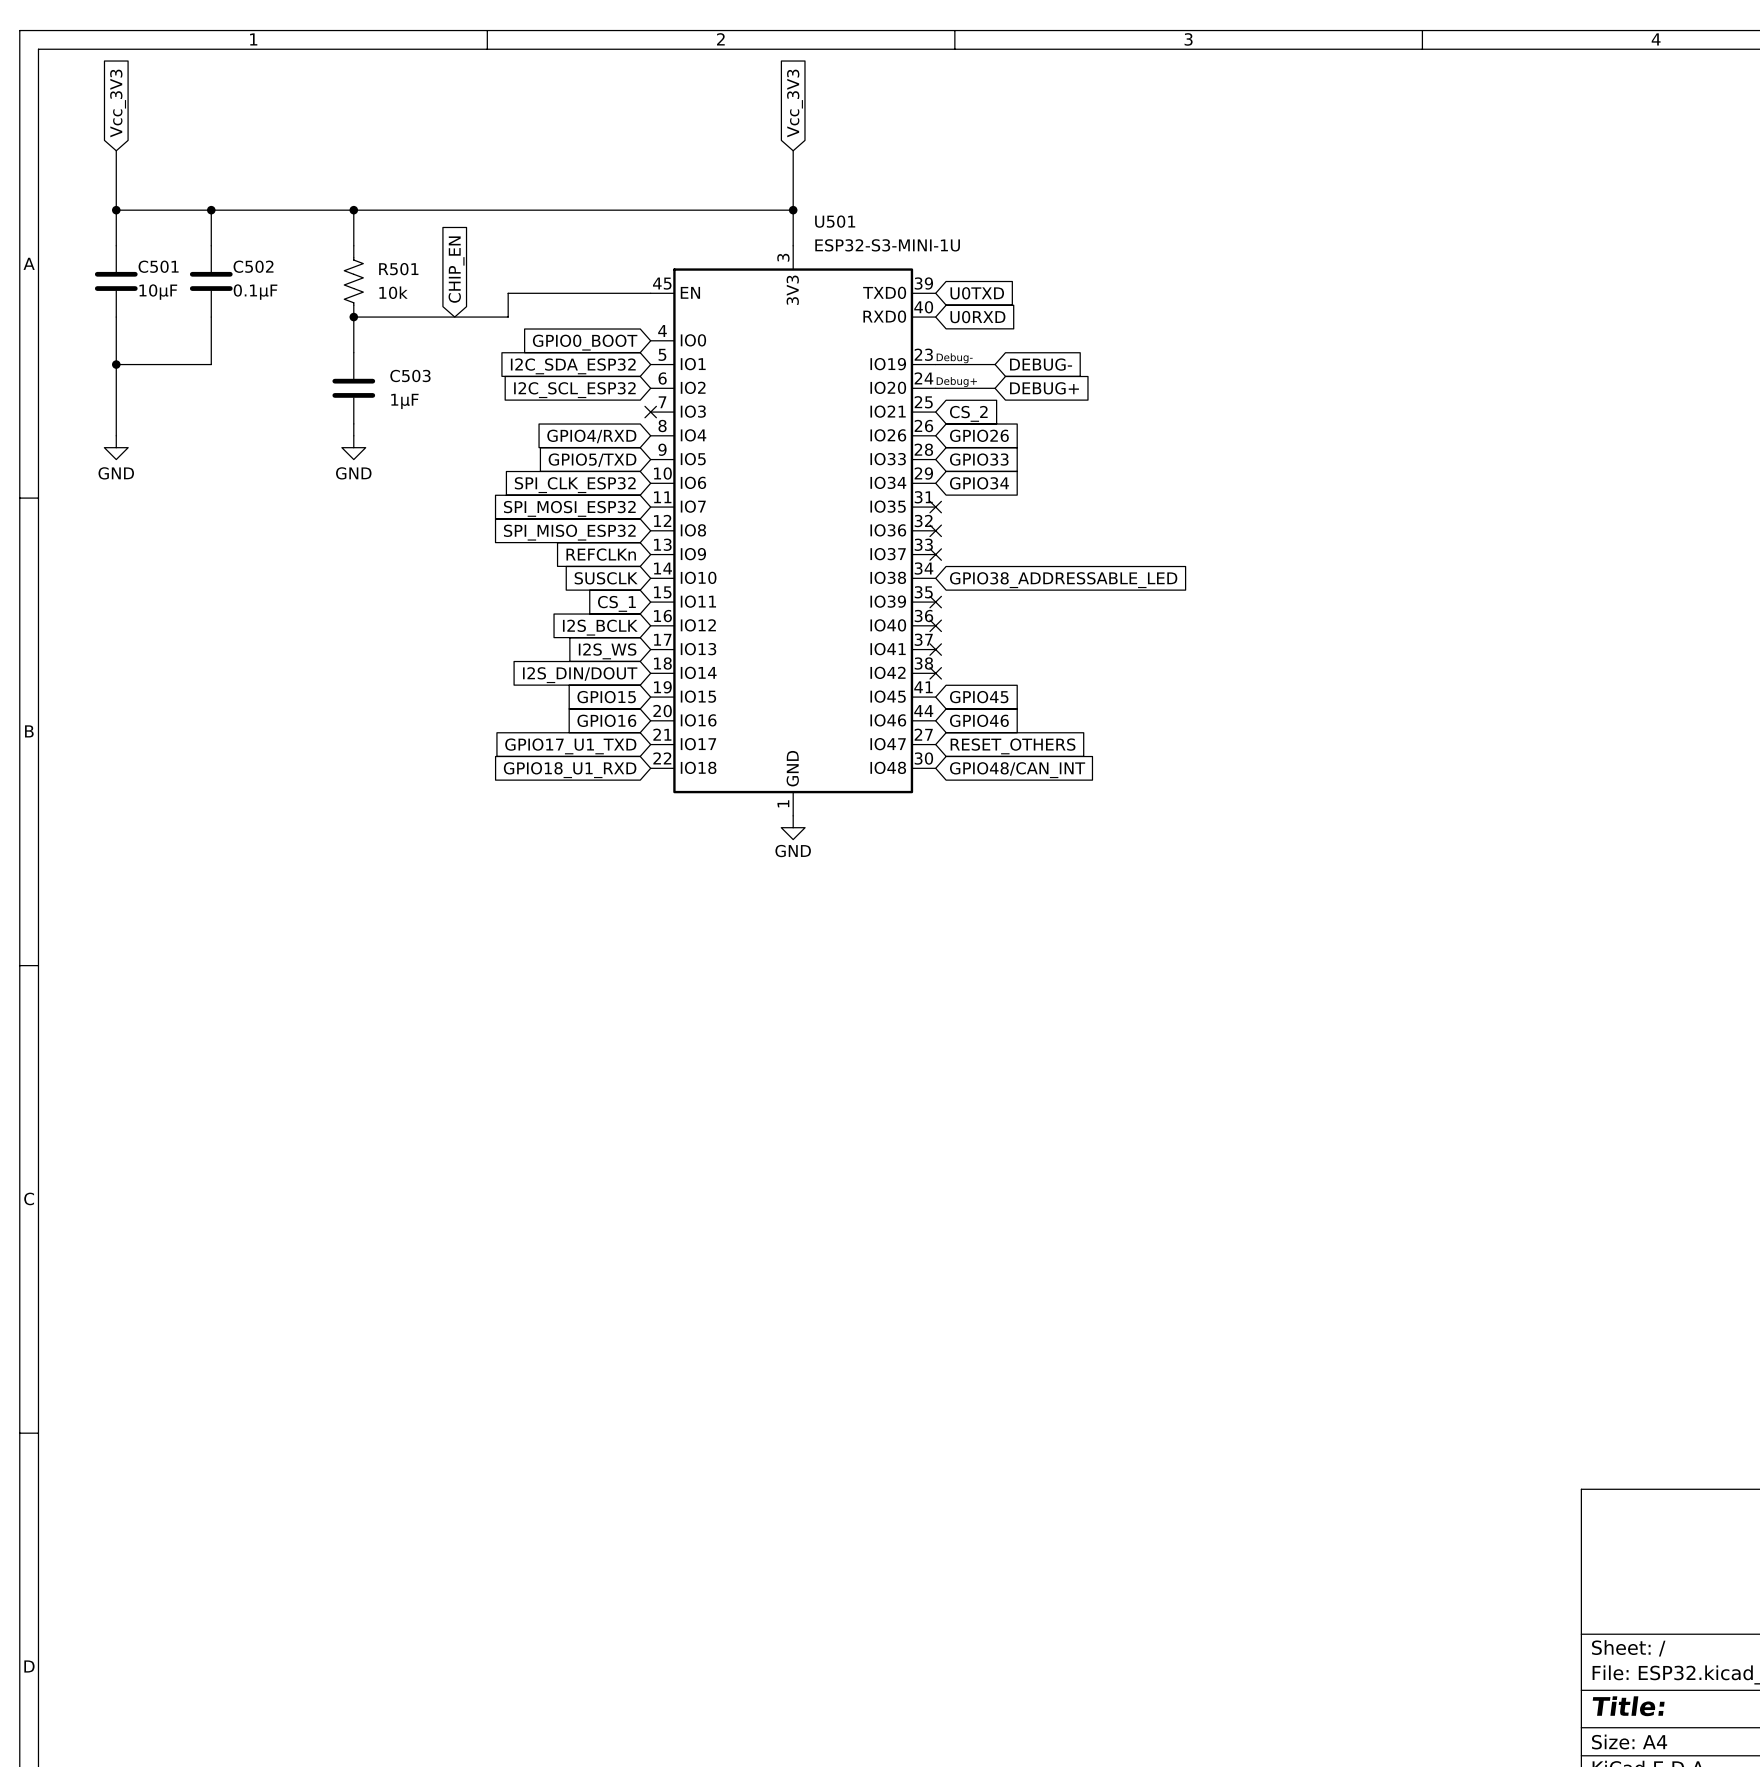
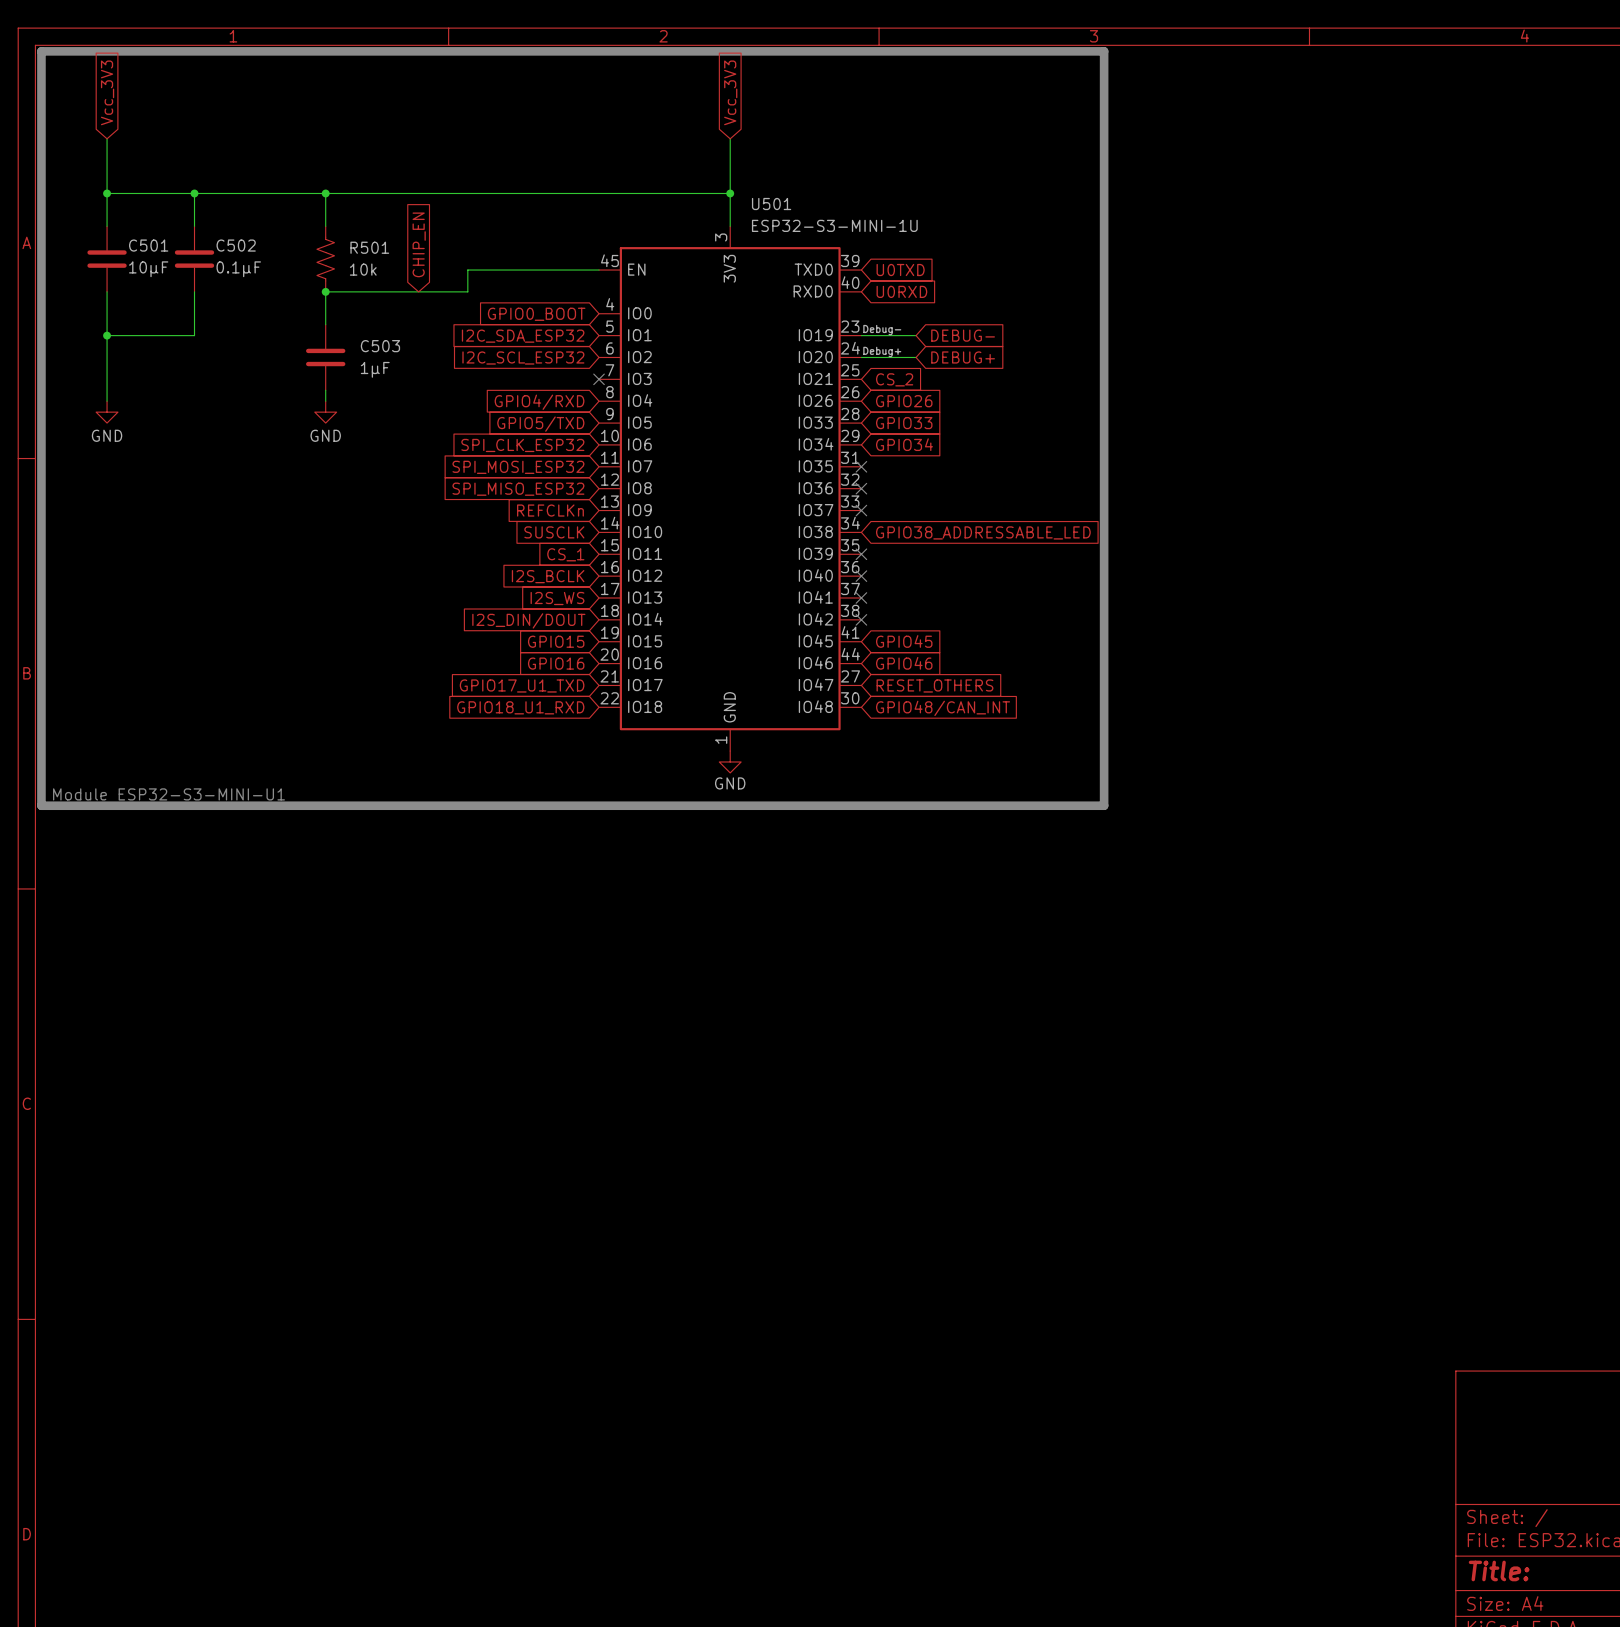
line: none -> (41, 51) (1104, 51) (1104, 805) (41, 805) (41, 51)
text: none -> Module ESP32-S3-MINI-U1 (168, 794)

